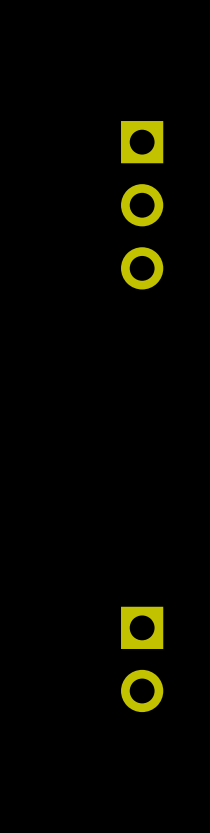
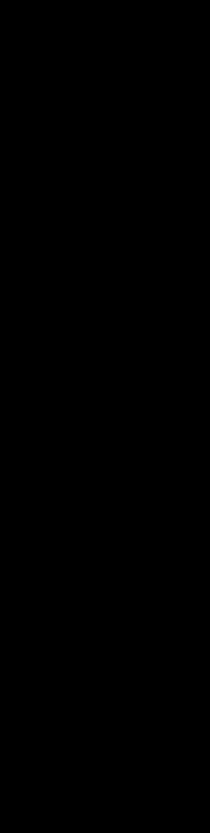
part: (142, 205) -> none
part: (142, 659) -> none

